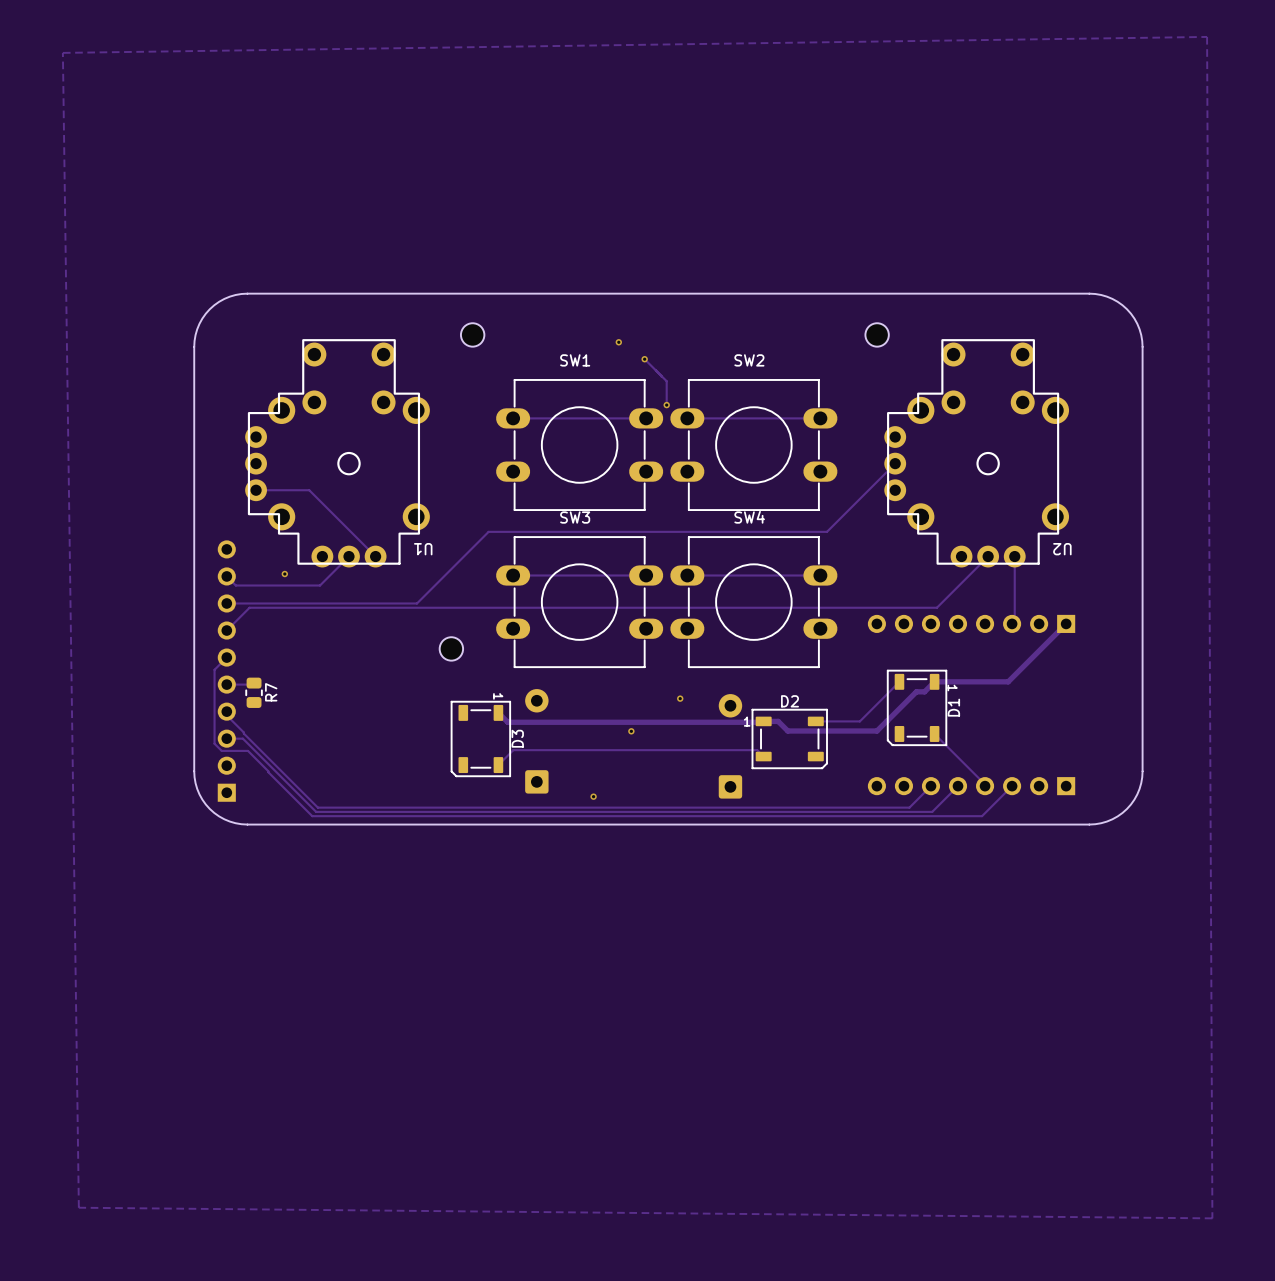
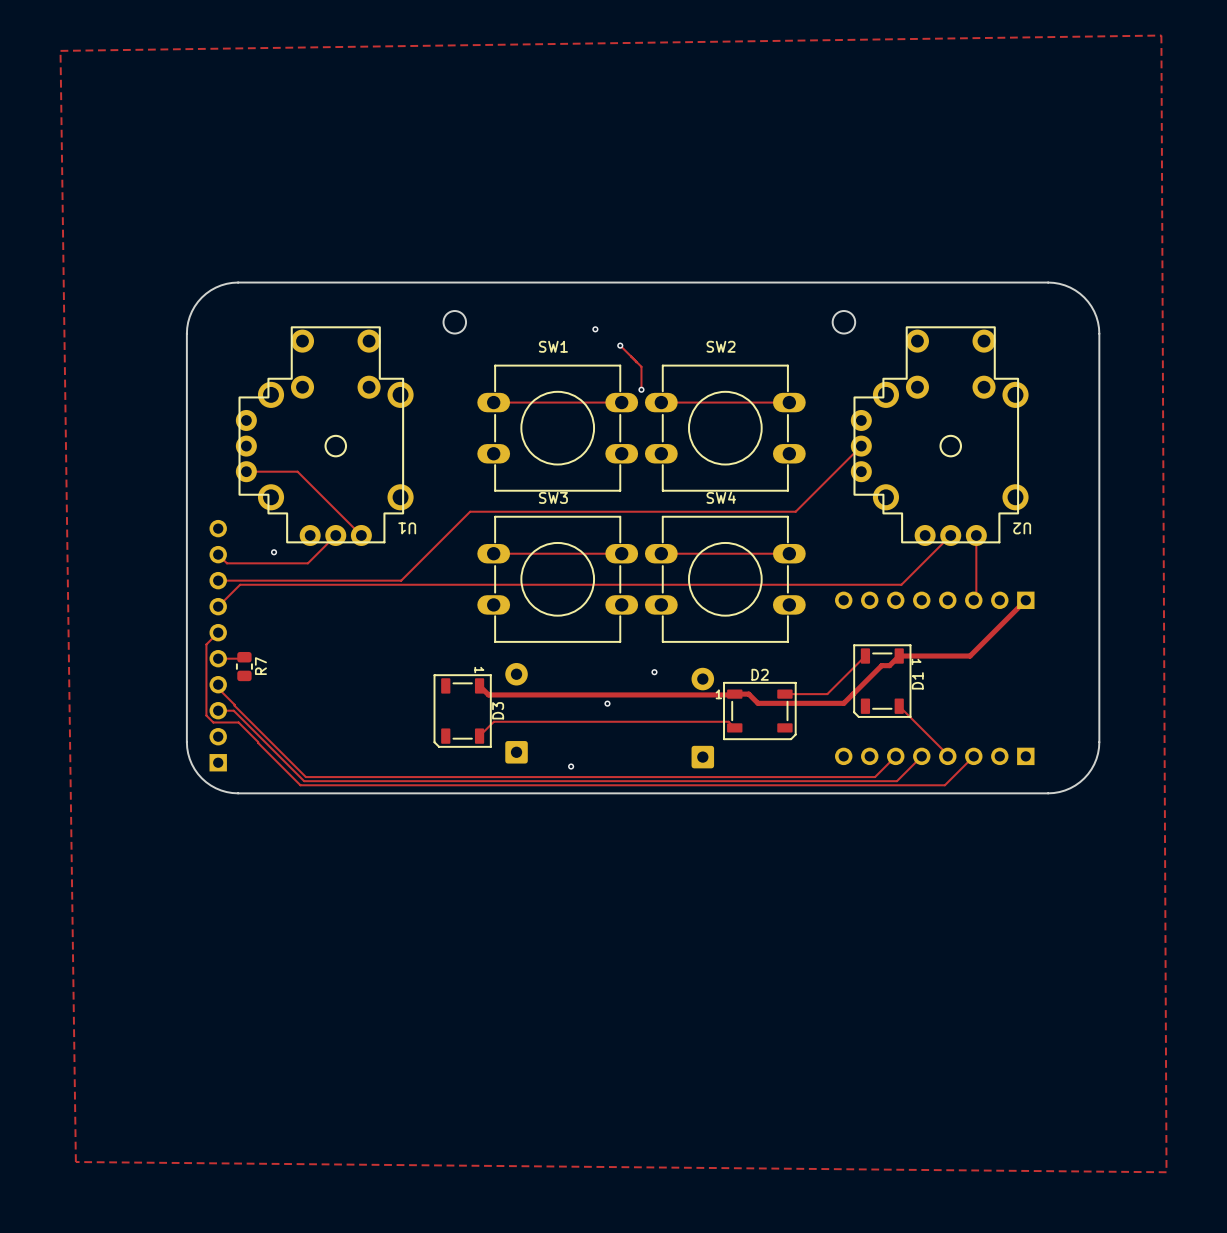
part: (451, 648) -> none

